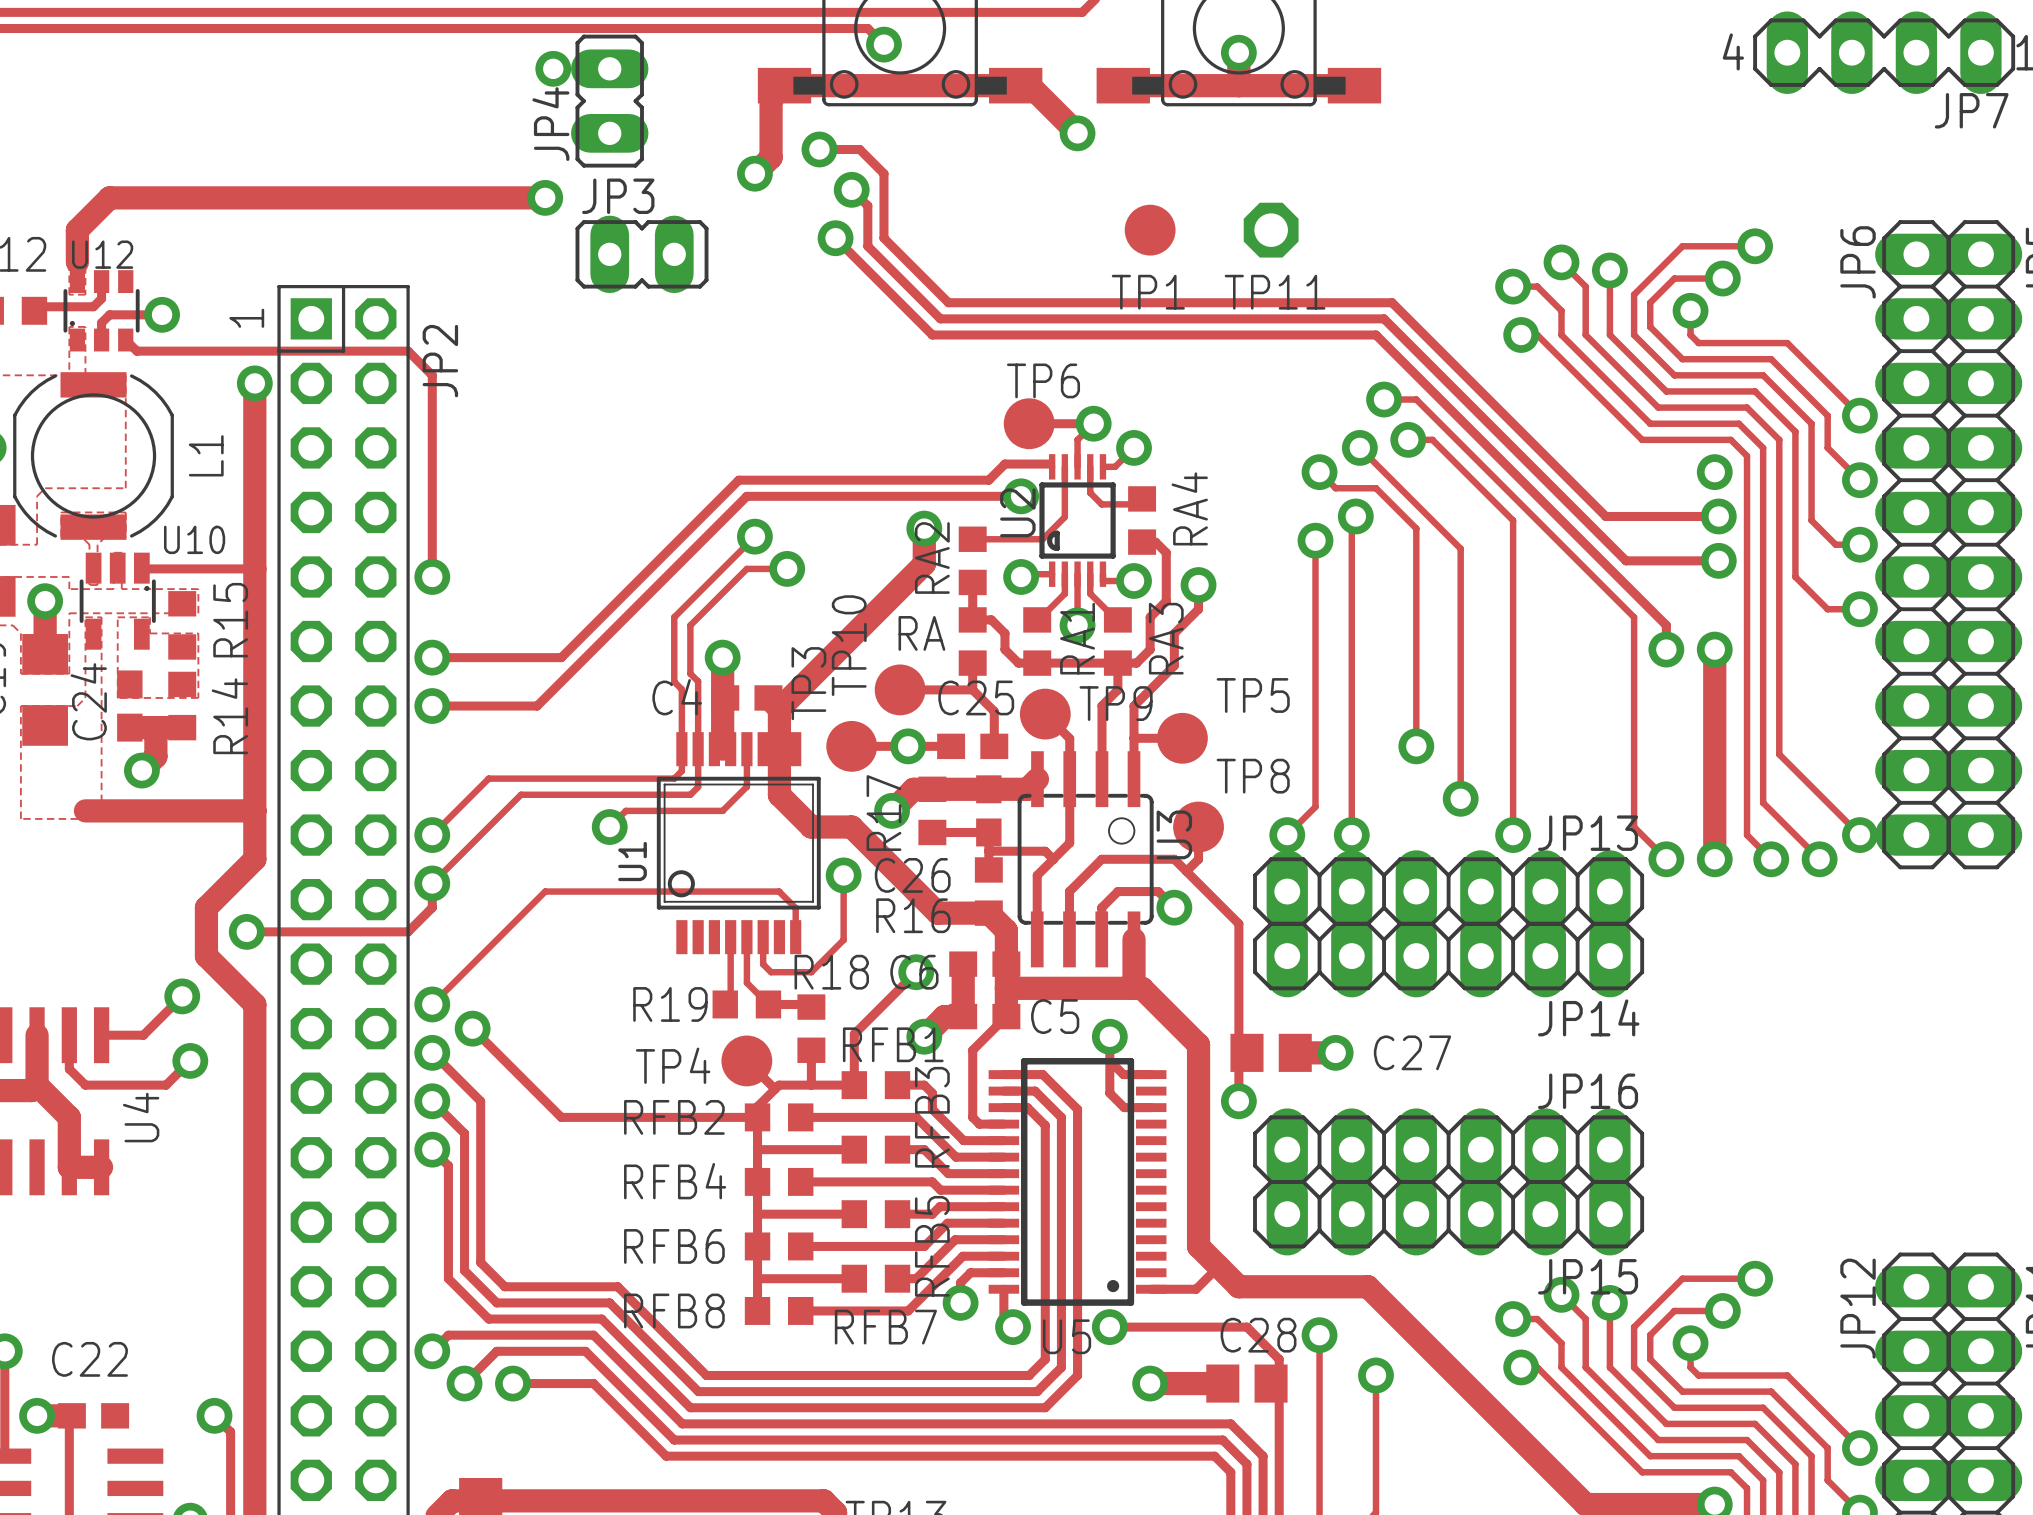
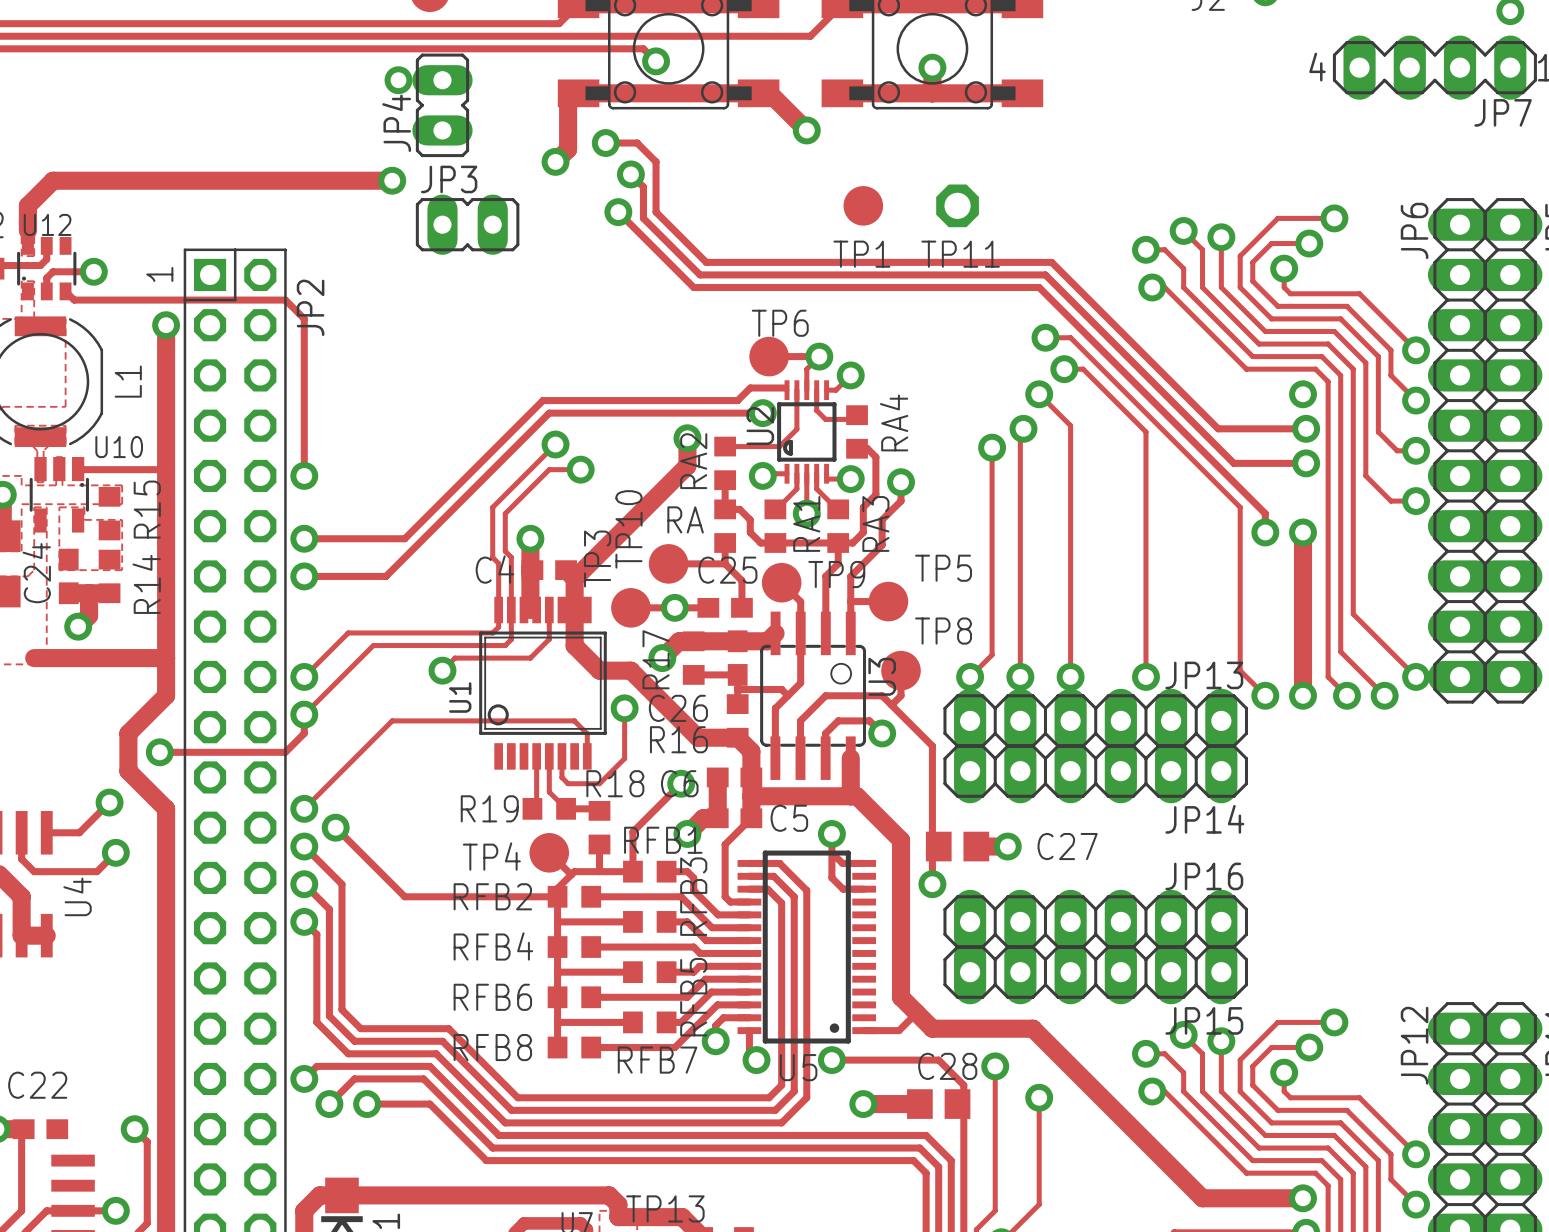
track: (1359, 447) (1460, 548) (1460, 798) -> none
via: (1359, 447) -> none
track: (1319, 472) (1335, 488) (1375, 488) (1416, 528) -> (1039, 394) (1070, 425) (1070, 438)
via: (1319, 472) -> none
via: none -> (1039, 394)
track: none -> (1070, 607) (1070, 676)
via: (1416, 746) -> none
via: (1460, 798) -> none
via: none -> (1070, 676)

